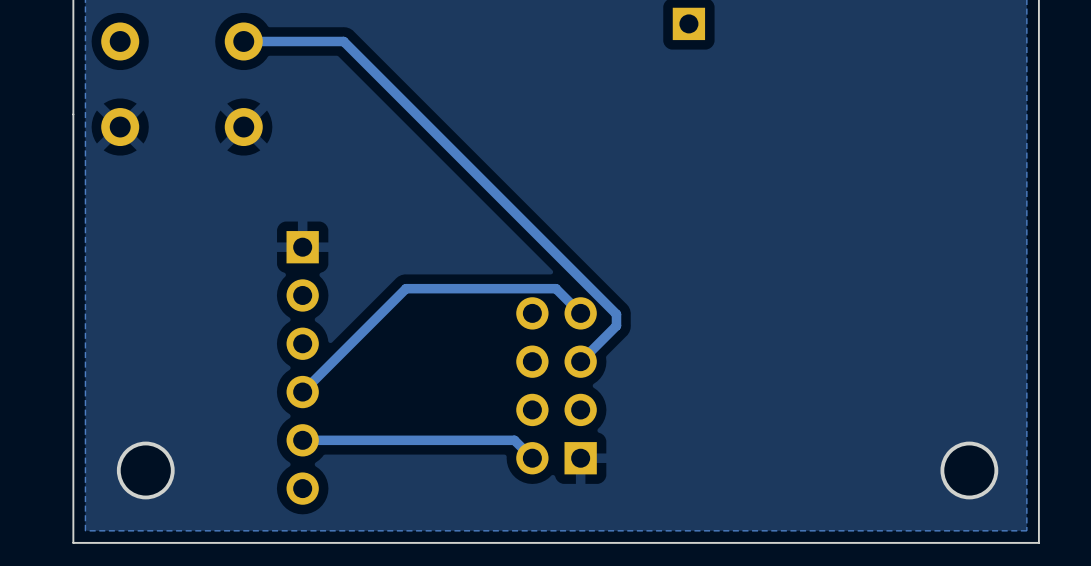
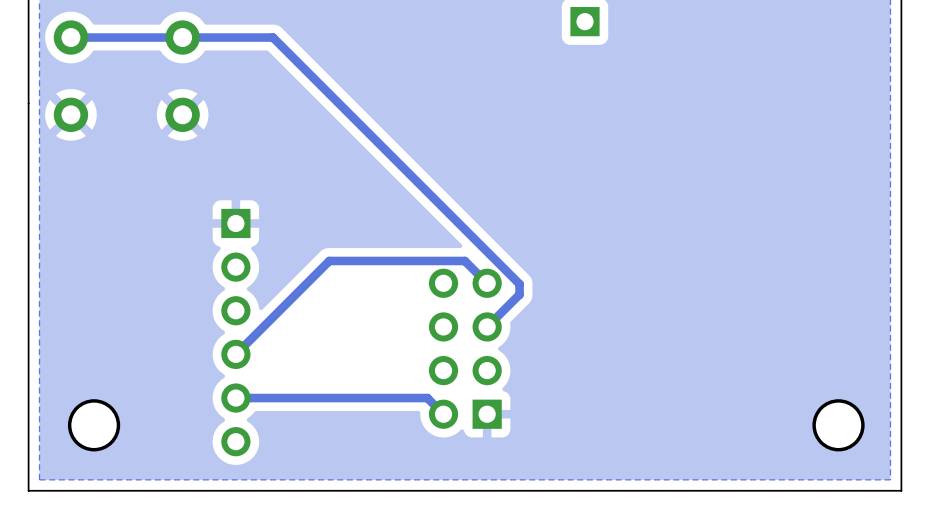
track: none -> (182, 37) (70, 37)

